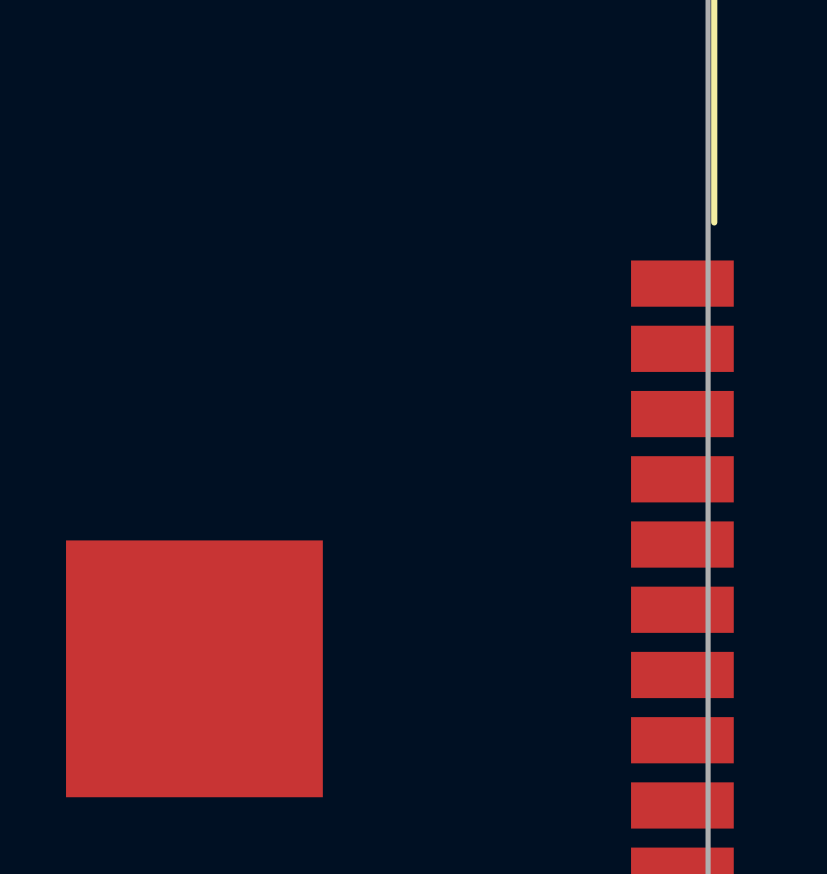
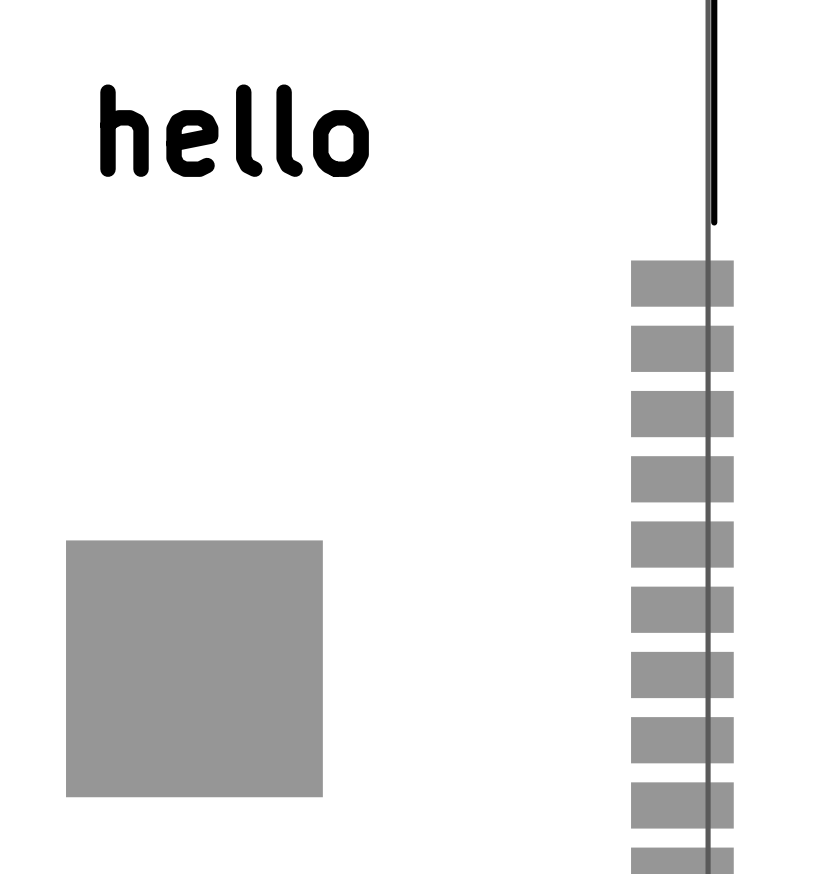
text: none -> hello (234, 130)

